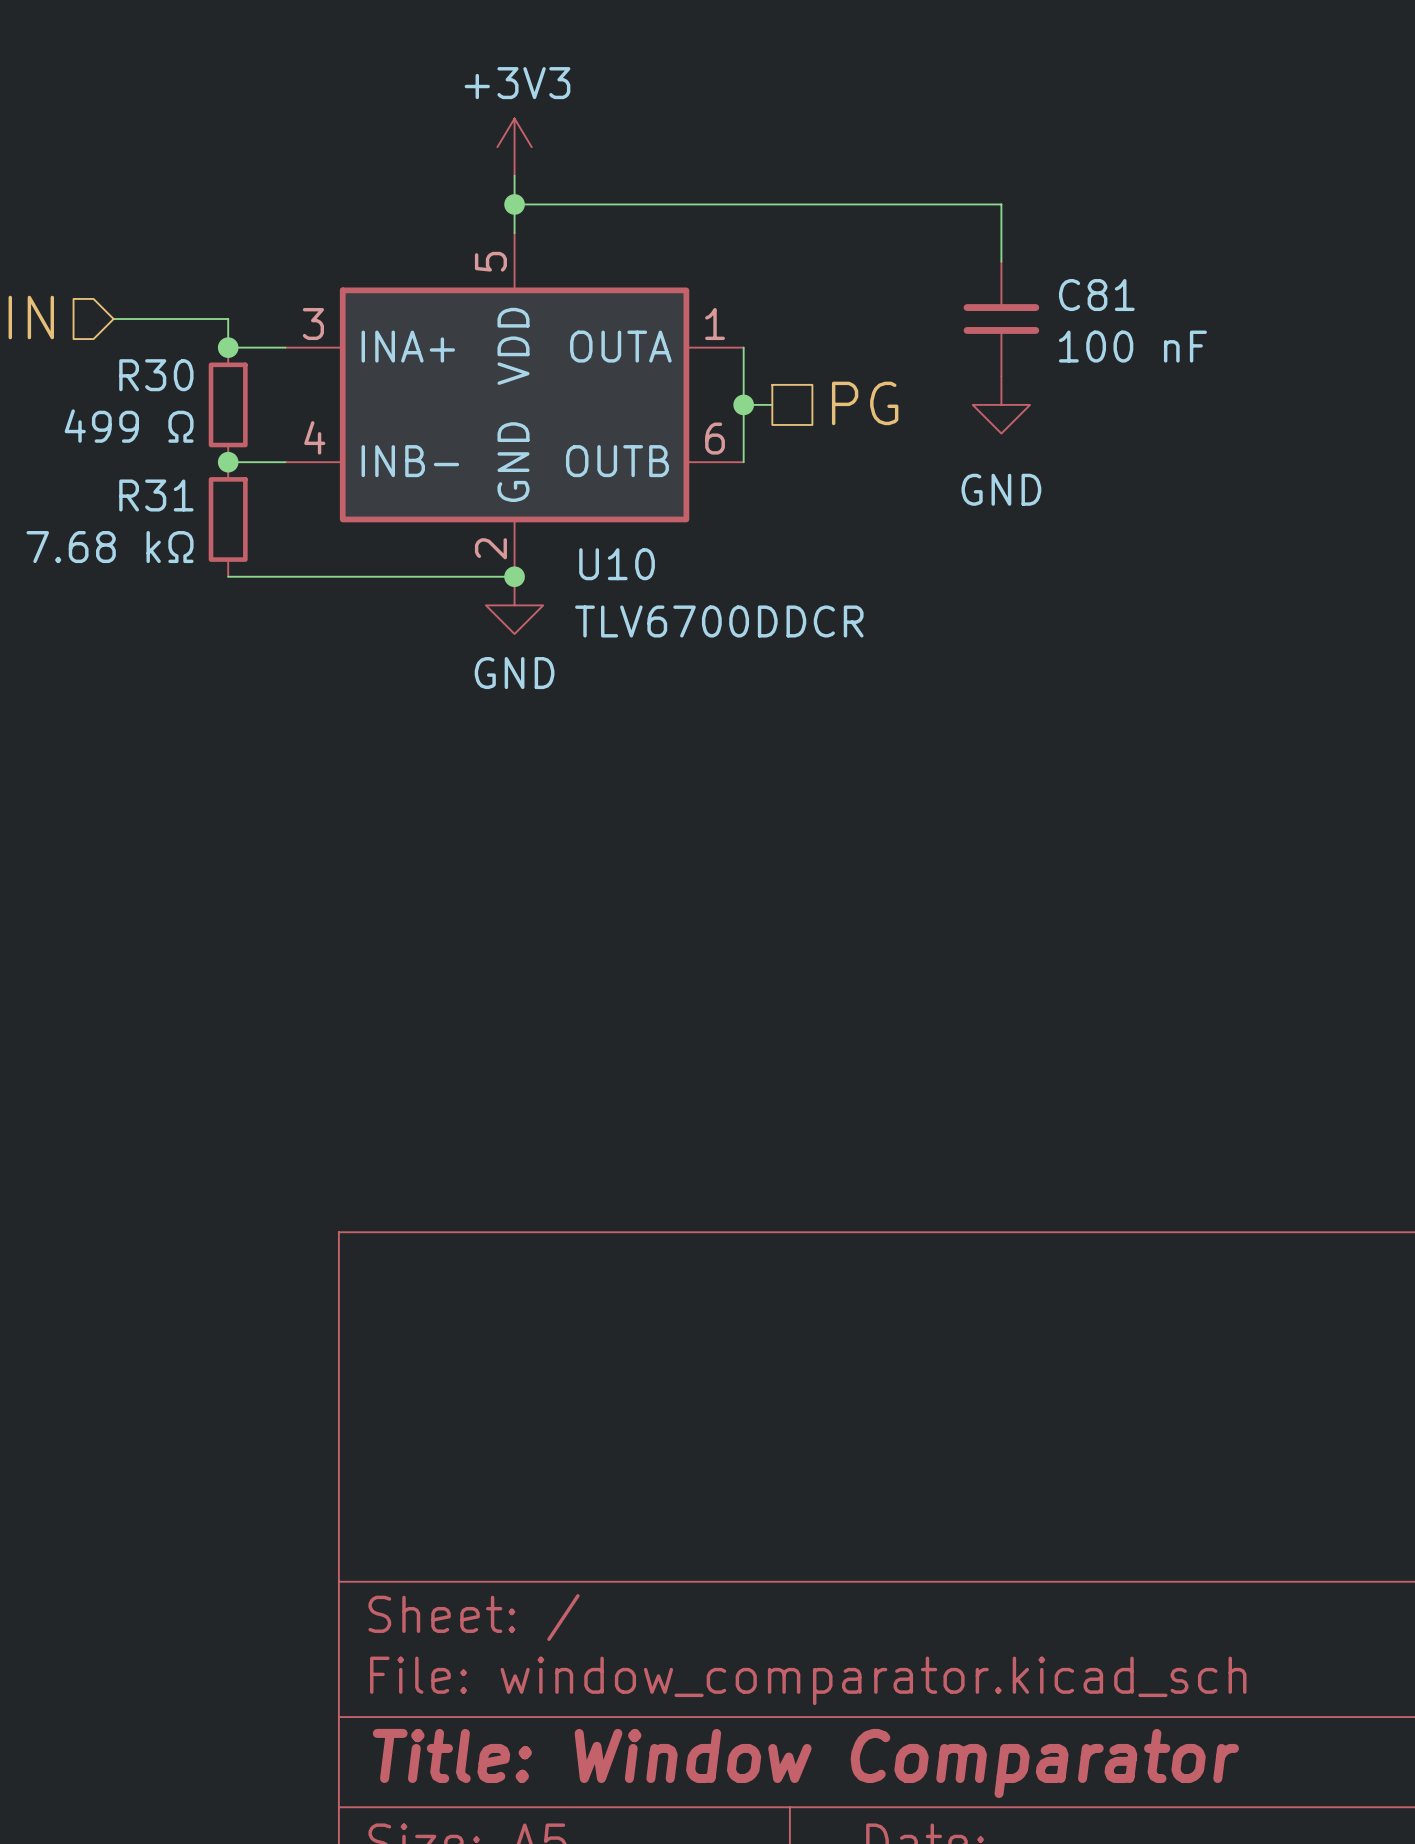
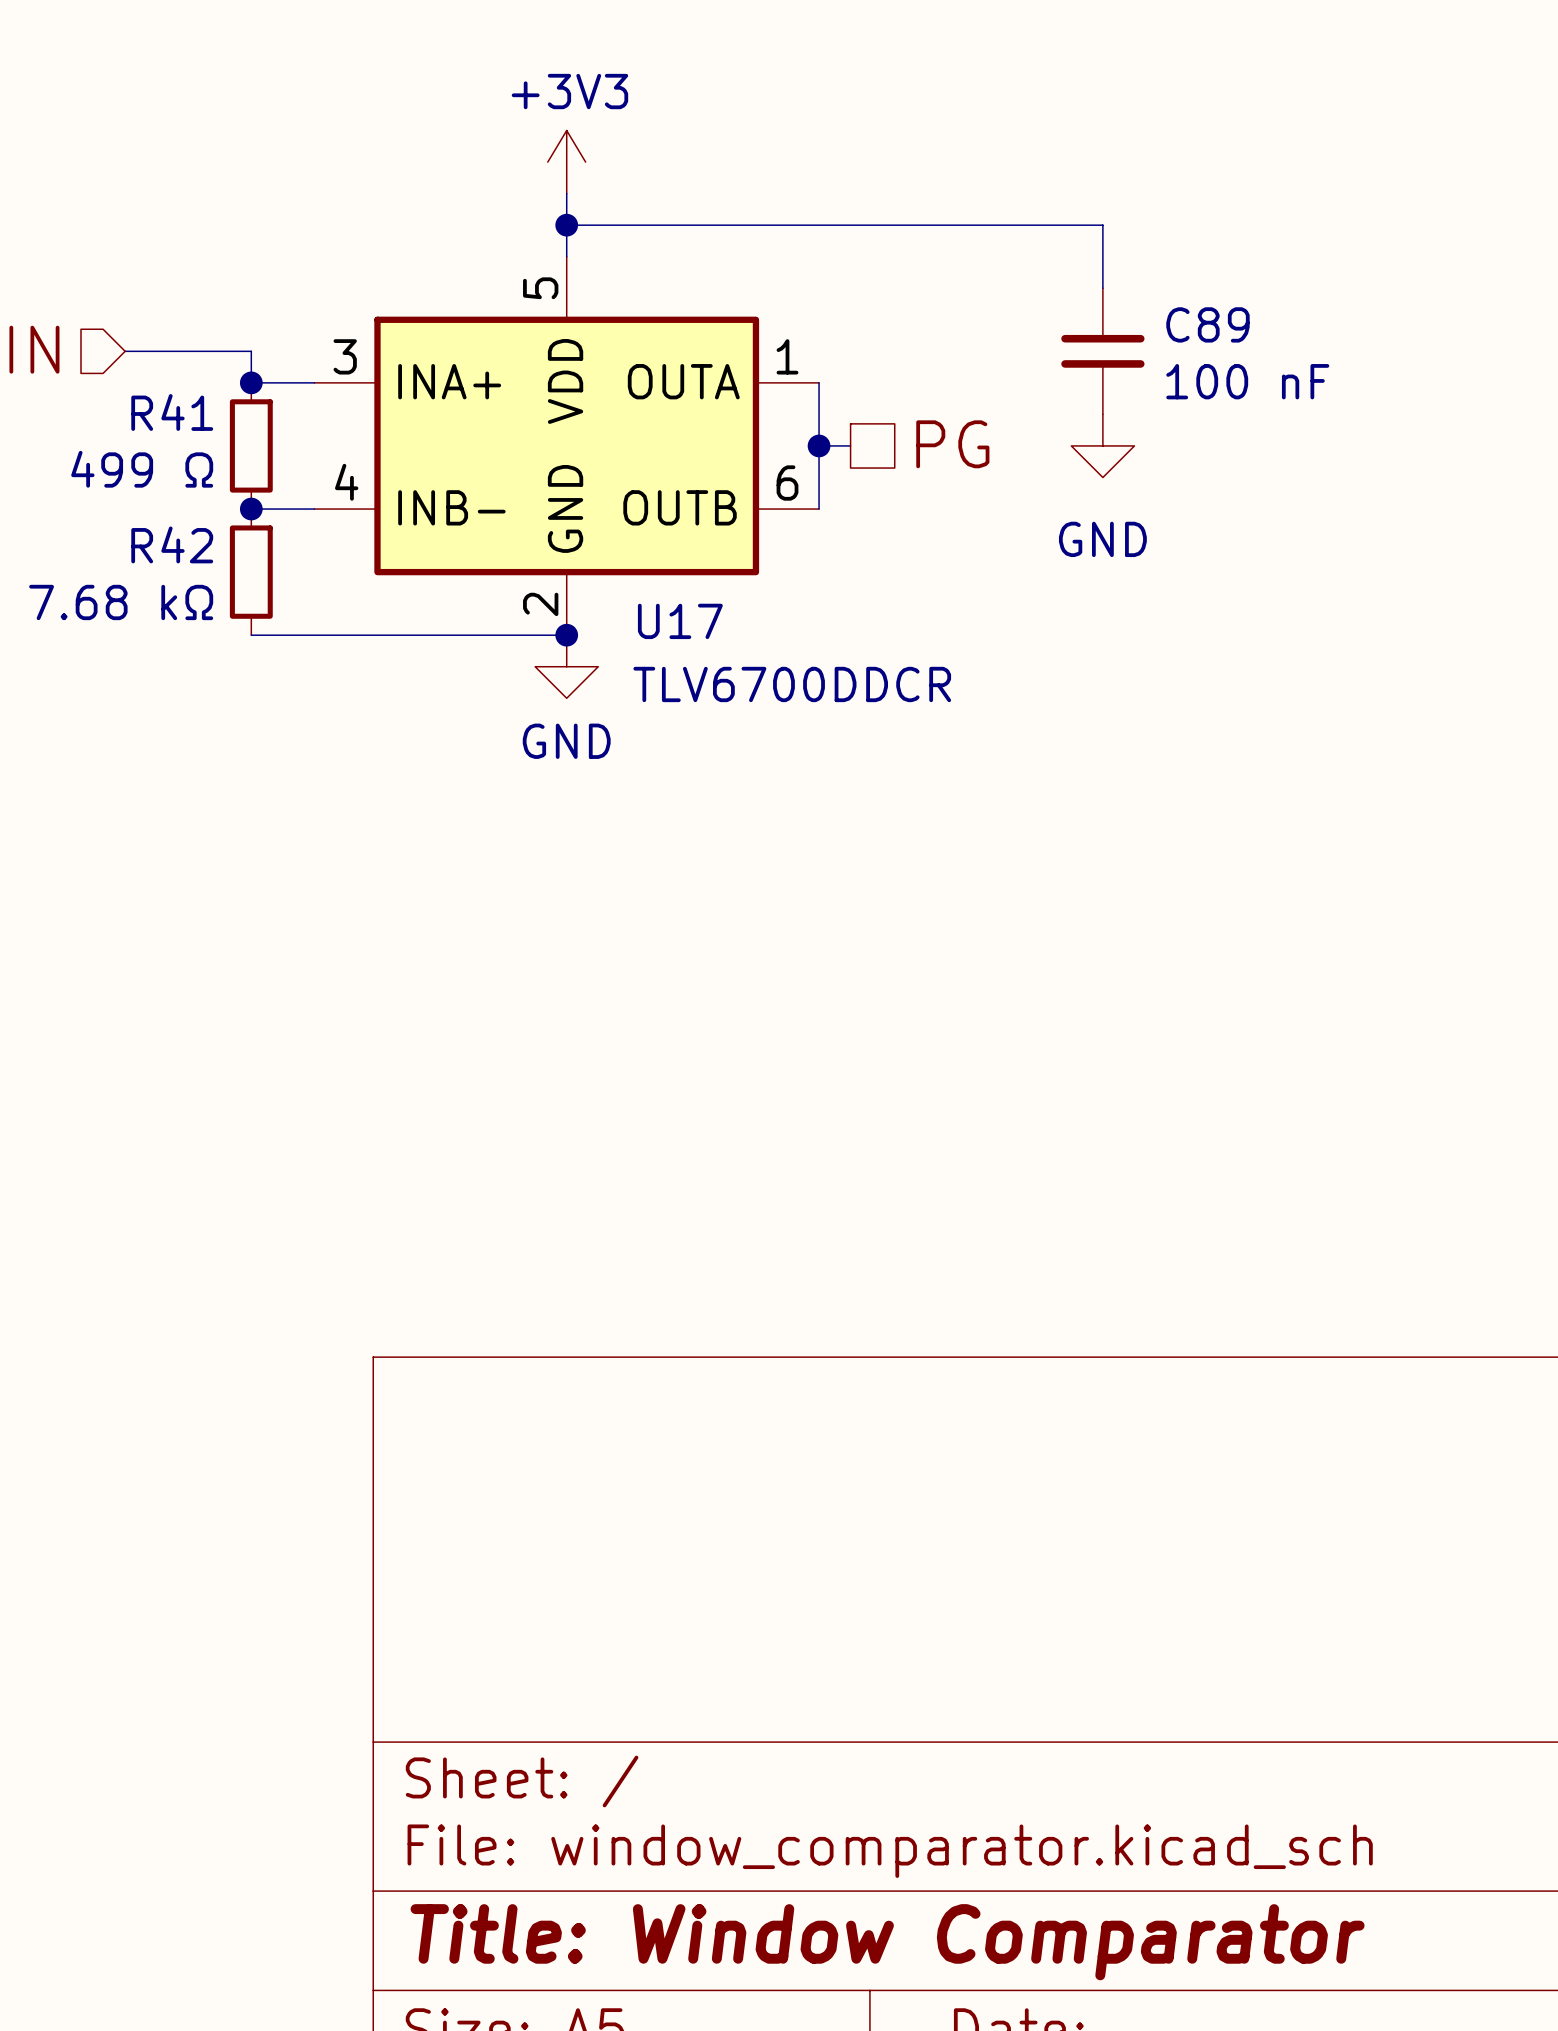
C81 name: C81 (1096, 295) -> C89 (1207, 324)
R30 name: R30 (156, 375) -> R41 (172, 412)
R31 name: R31 (156, 495) -> R42 (172, 544)
U10 name: U10 (617, 564) -> U17 (680, 621)

